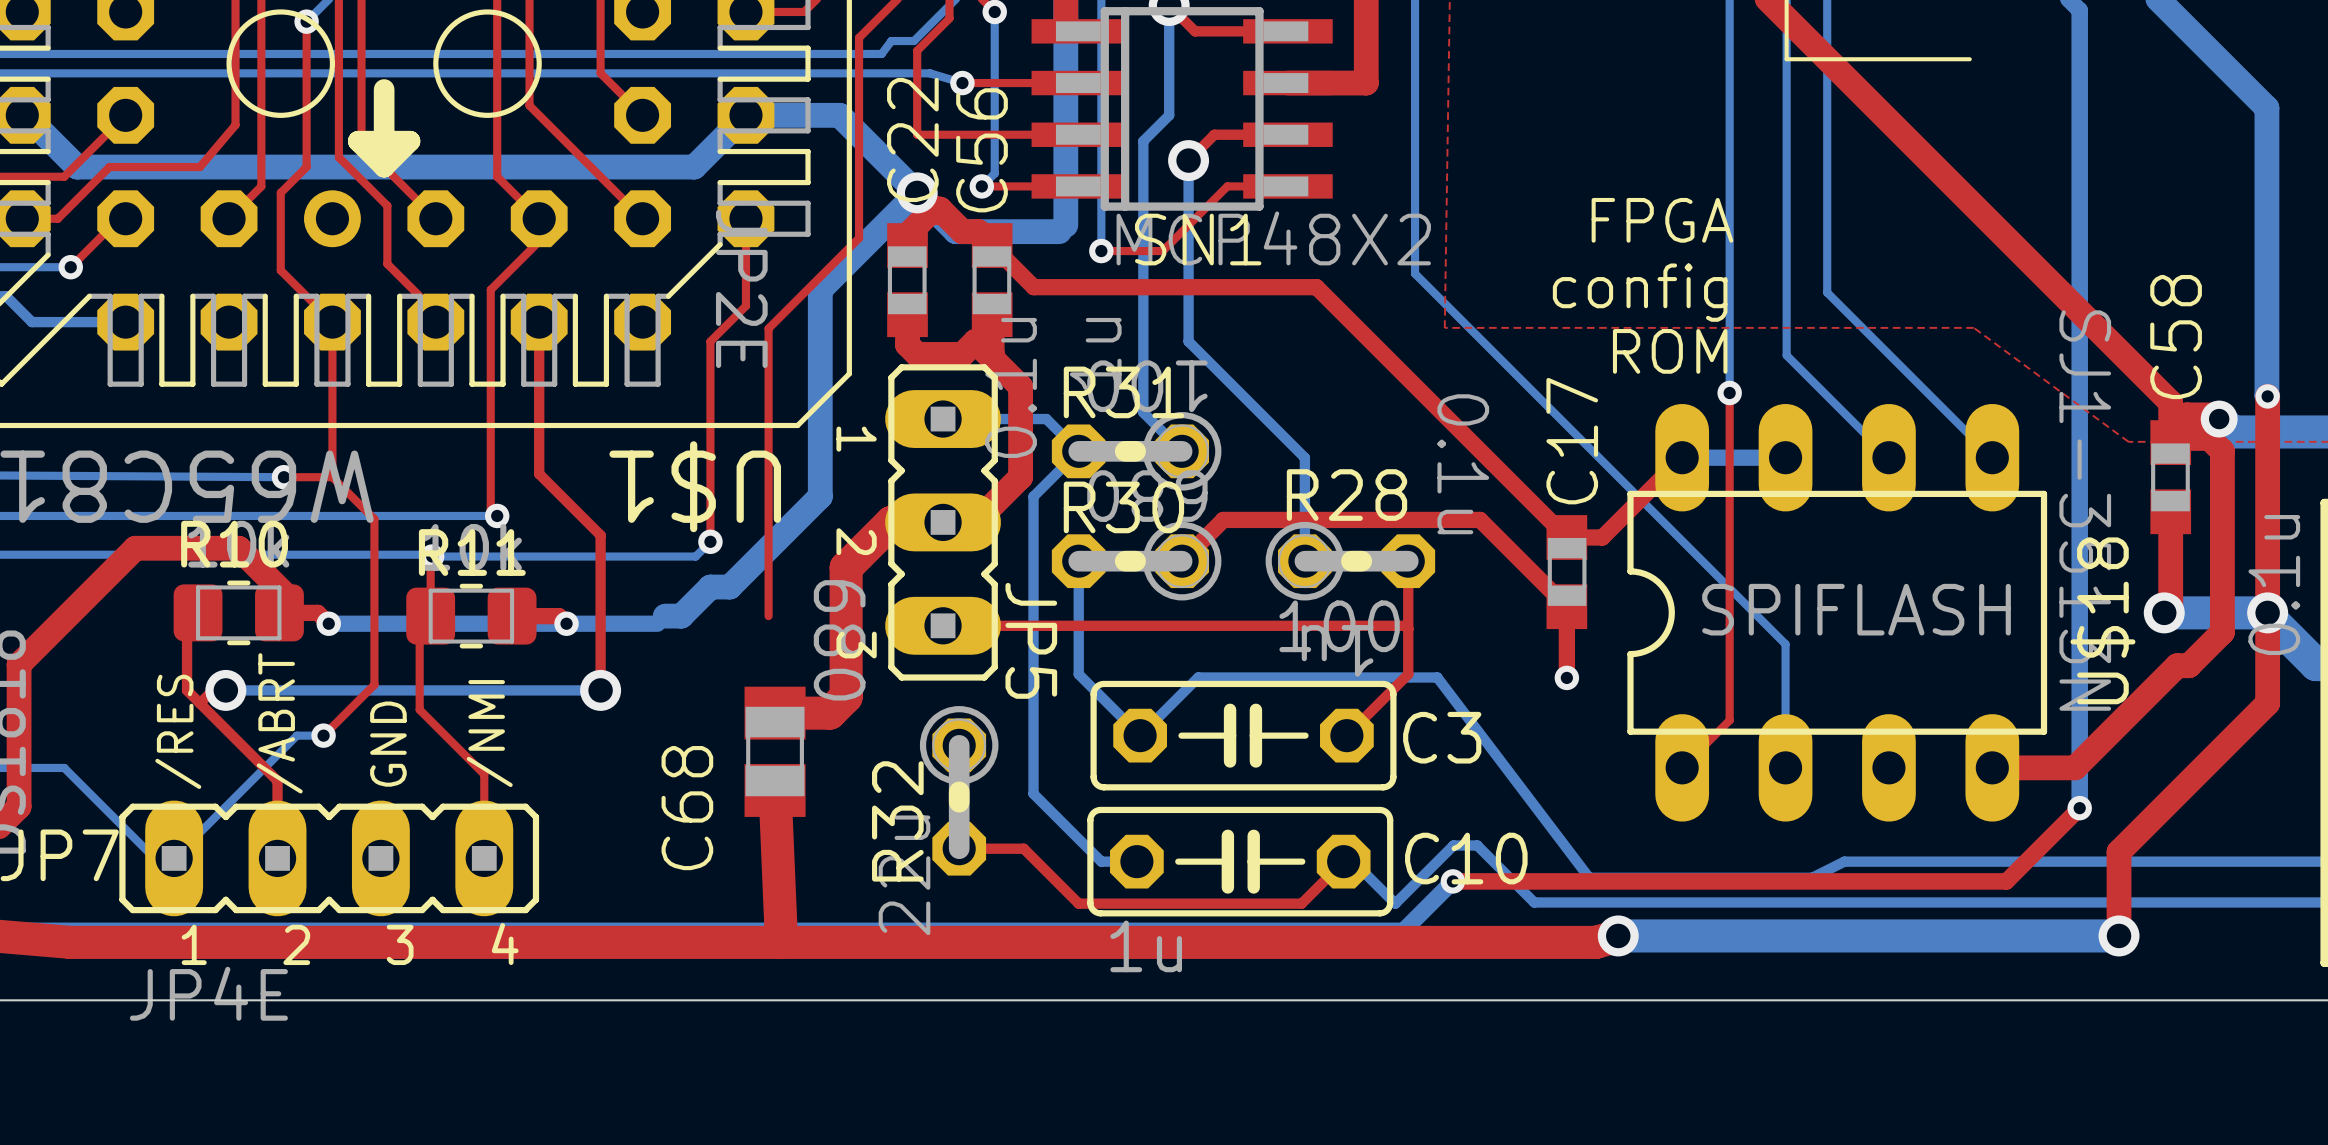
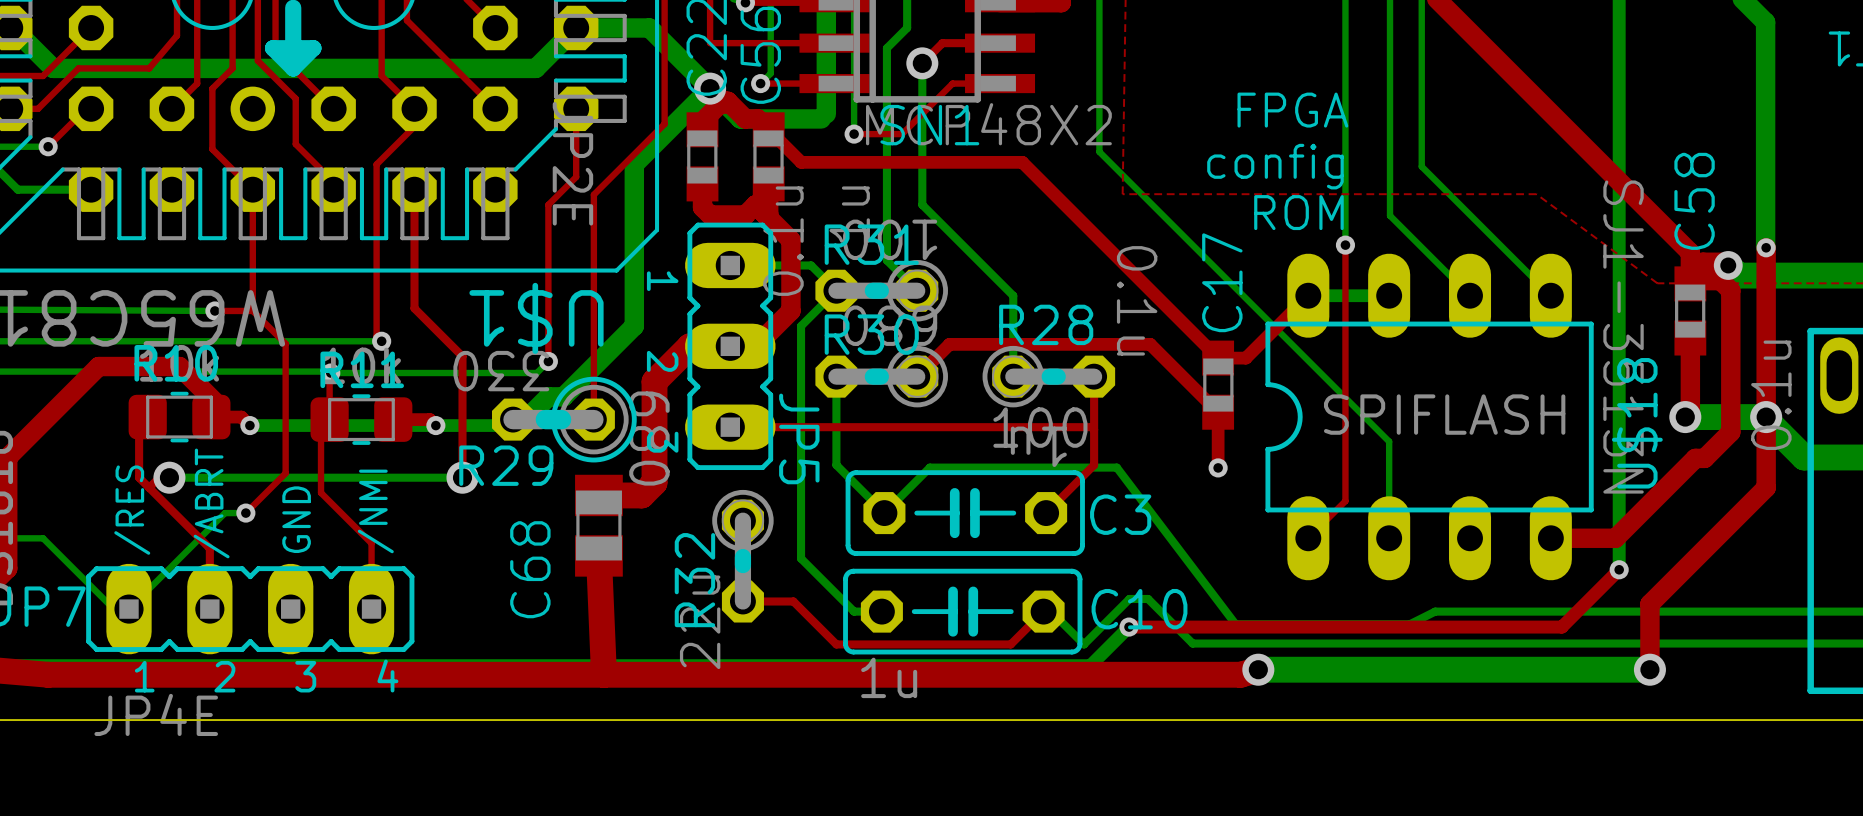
R29: none -> 330 (564, 419)

